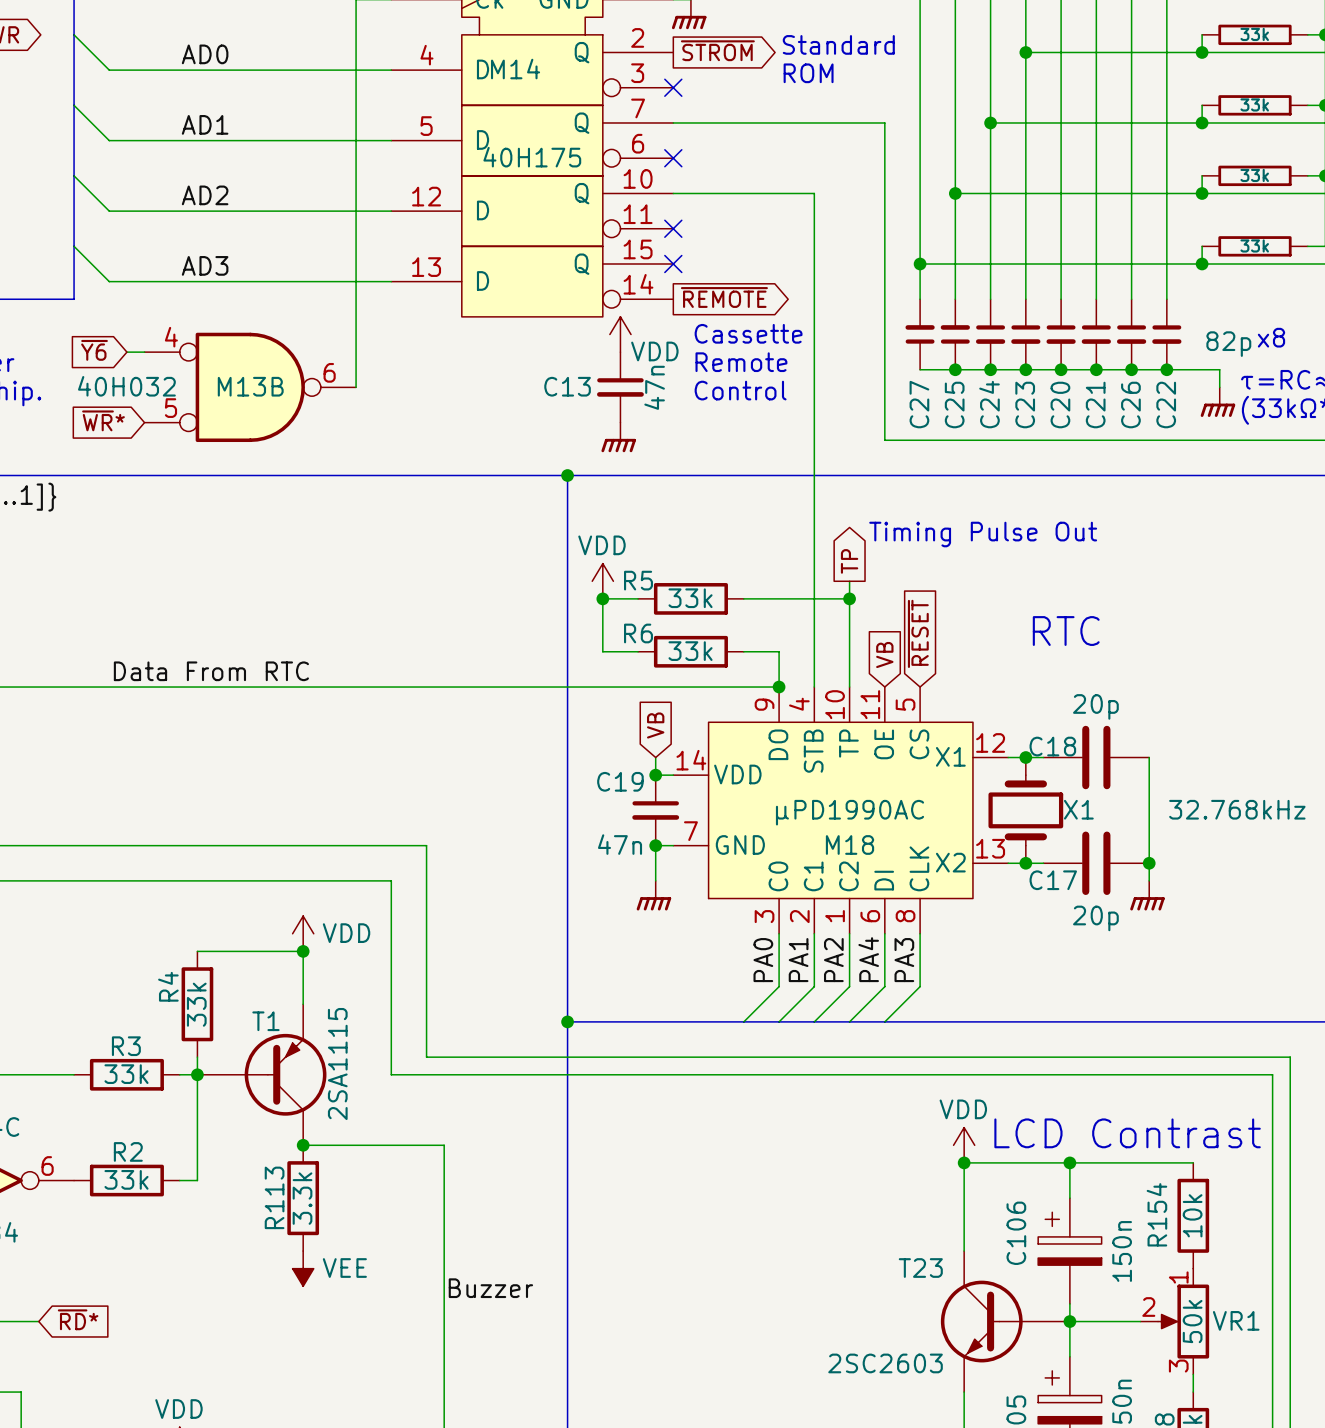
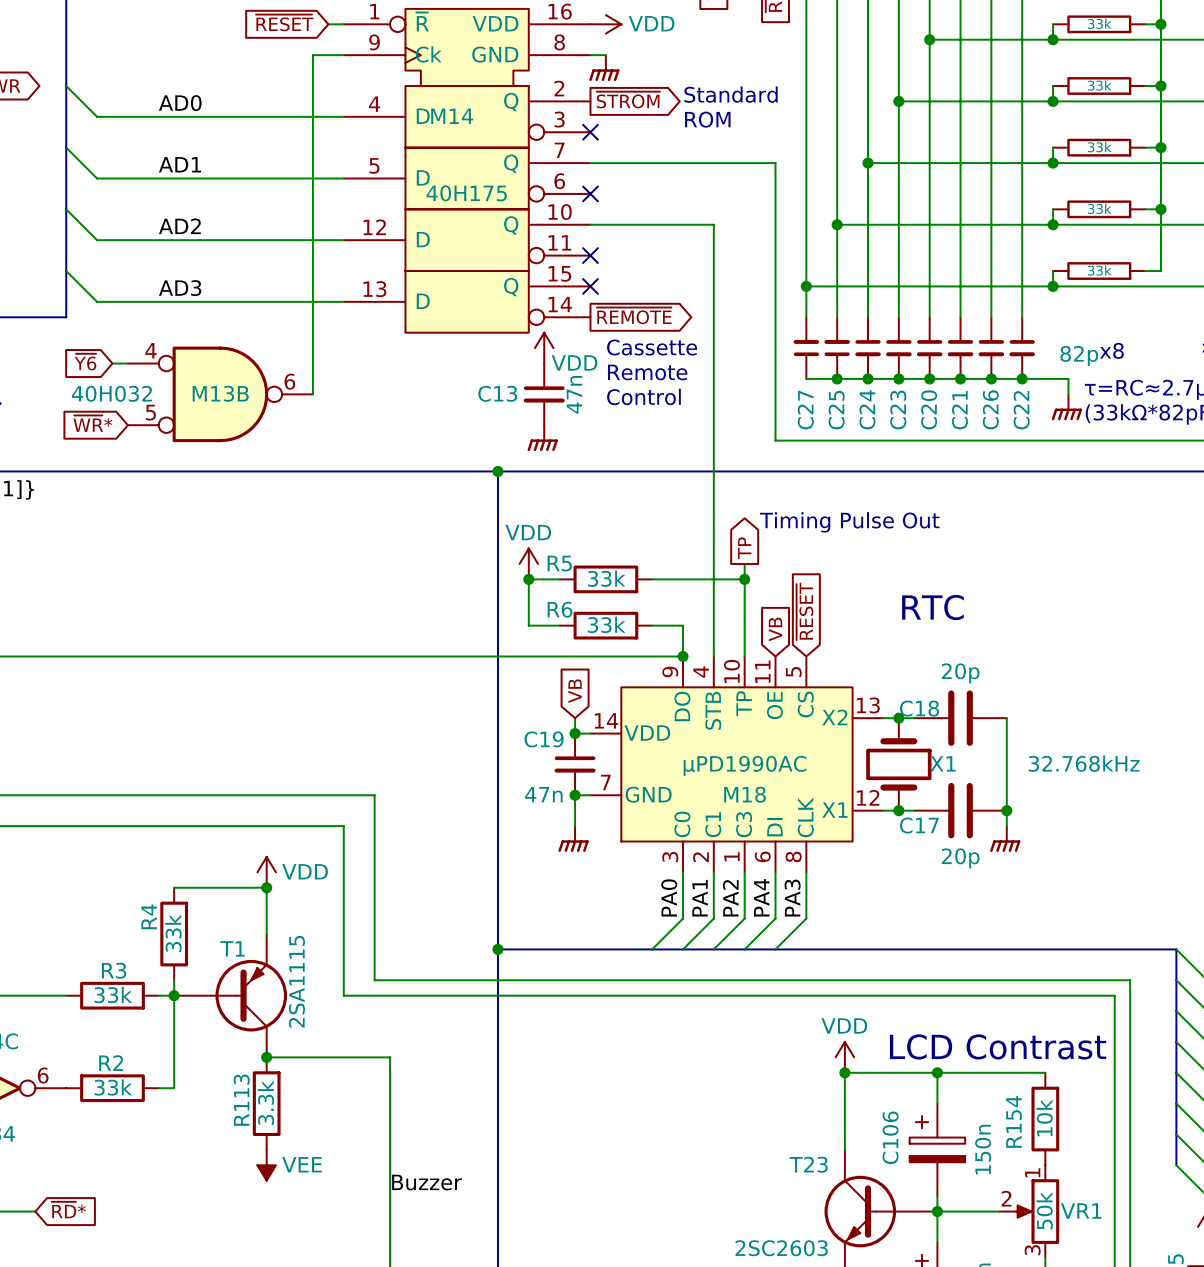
label: Data From RTC (211, 671) -> none
M18 pin number: 12 (990, 742) -> 13 (868, 705)
M18 pin name: X1 (950, 756) -> X2 (834, 717)
M18 pin number: 13 (990, 848) -> 12 (868, 797)
M18 pin name: X2 (950, 862) -> X1 (834, 810)
M18 pin name: C2 (848, 876) -> C3 (744, 824)

